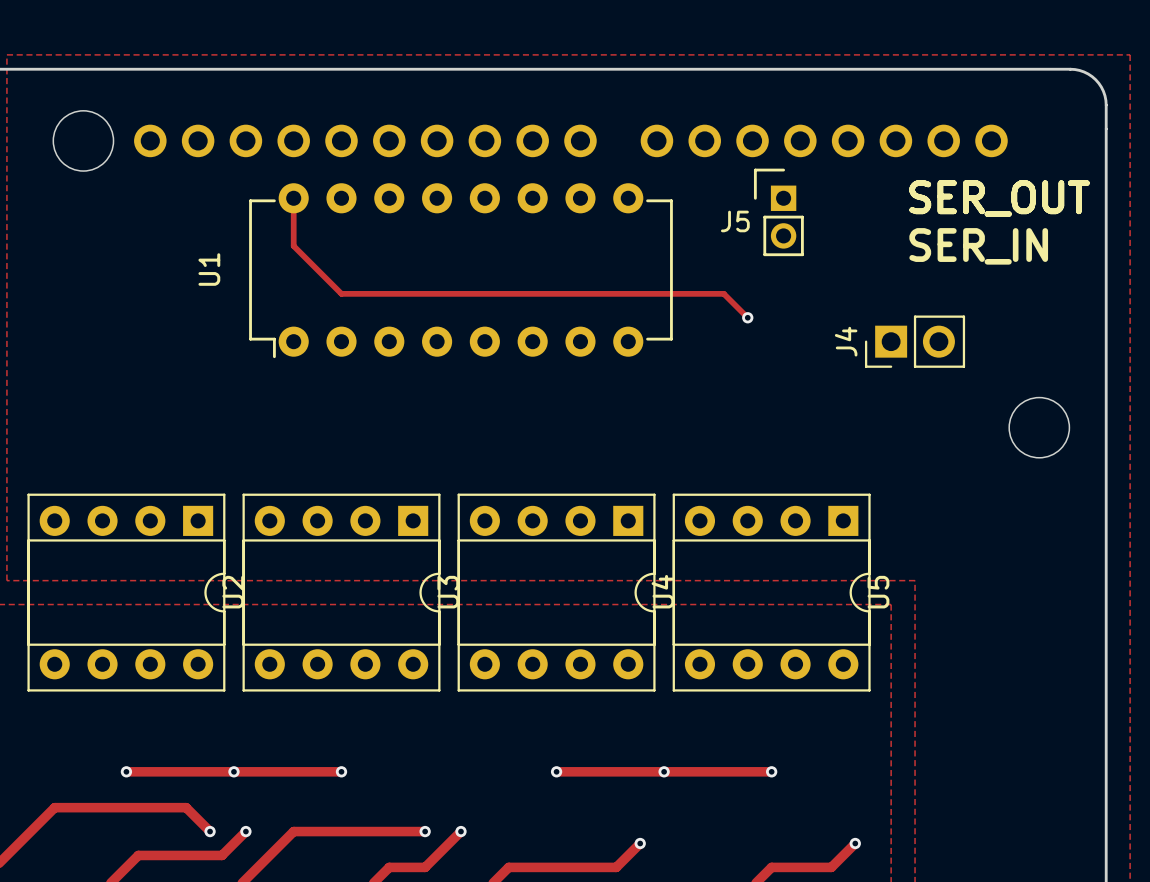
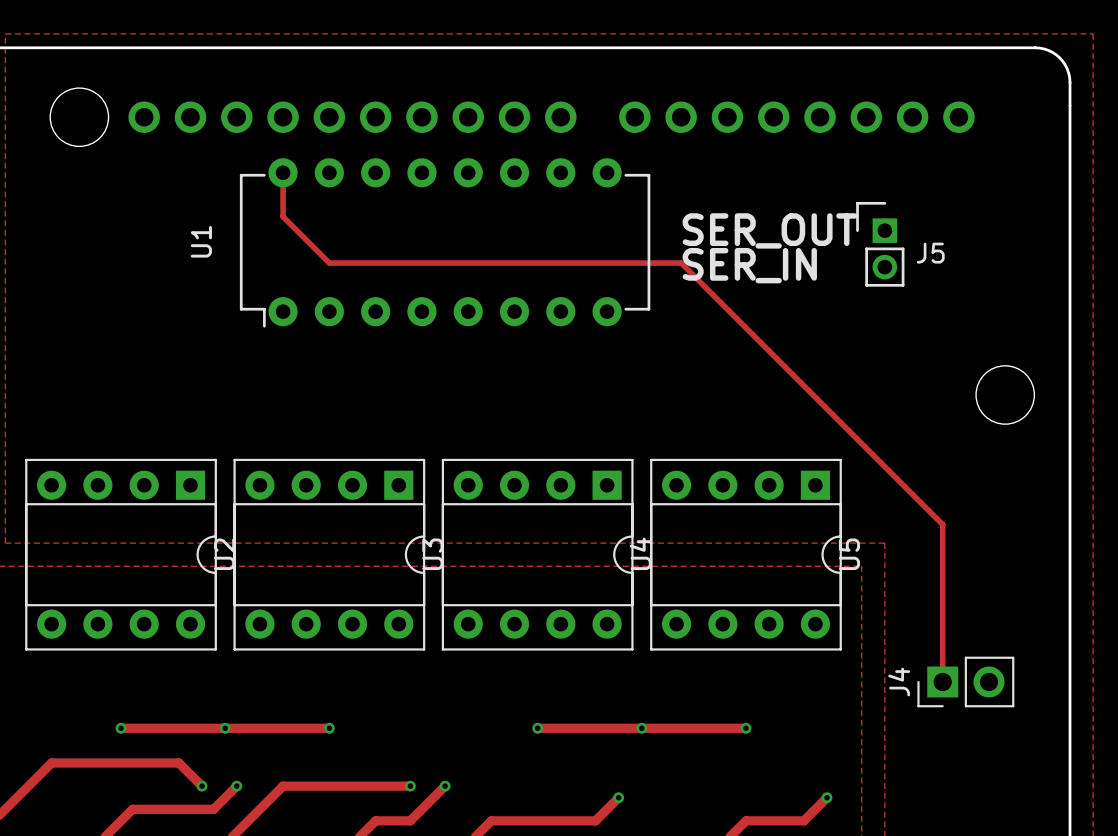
text position: SER_OUT (999, 198) -> SER_OUT (769, 230)
J5 position: (778, 212) -> (880, 244)
J5 name position: J5 (735, 221) -> J5 (930, 253)
track: (293, 243) (293, 246) (341, 293) (723, 293) (747, 317) -> (283, 216) (329, 263) (681, 263) (942, 524) (942, 681)
text position: SER_IN (978, 246) -> SER_IN (749, 265)
via: (747, 317) -> none
J4 position: (915, 341) -> (965, 681)

